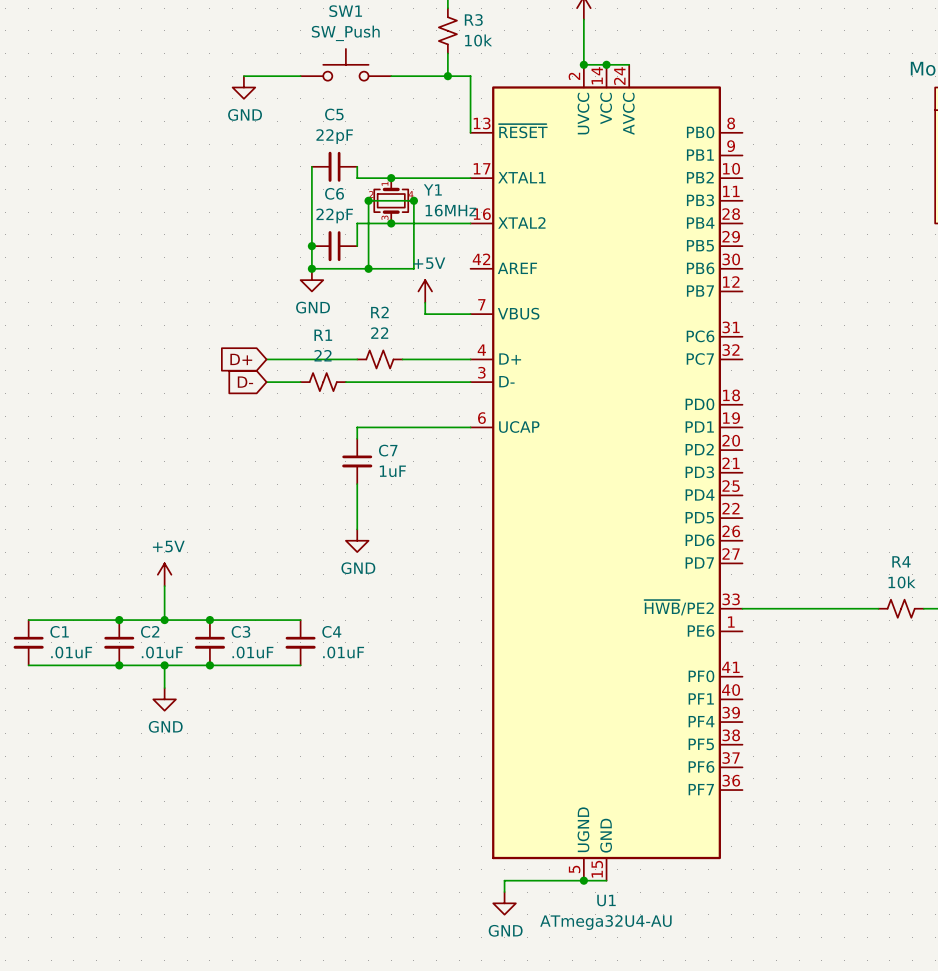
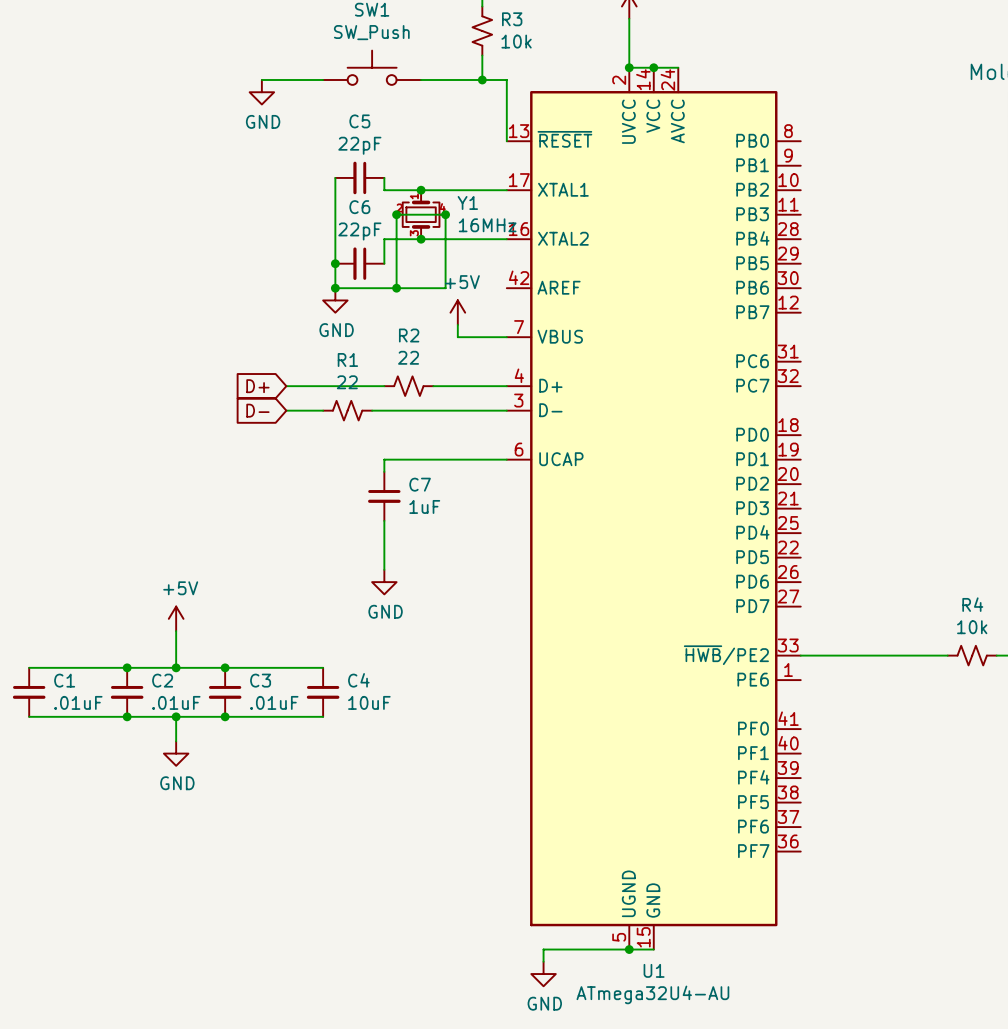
C4 value: .01uF (343, 652) -> 10uF (369, 702)

